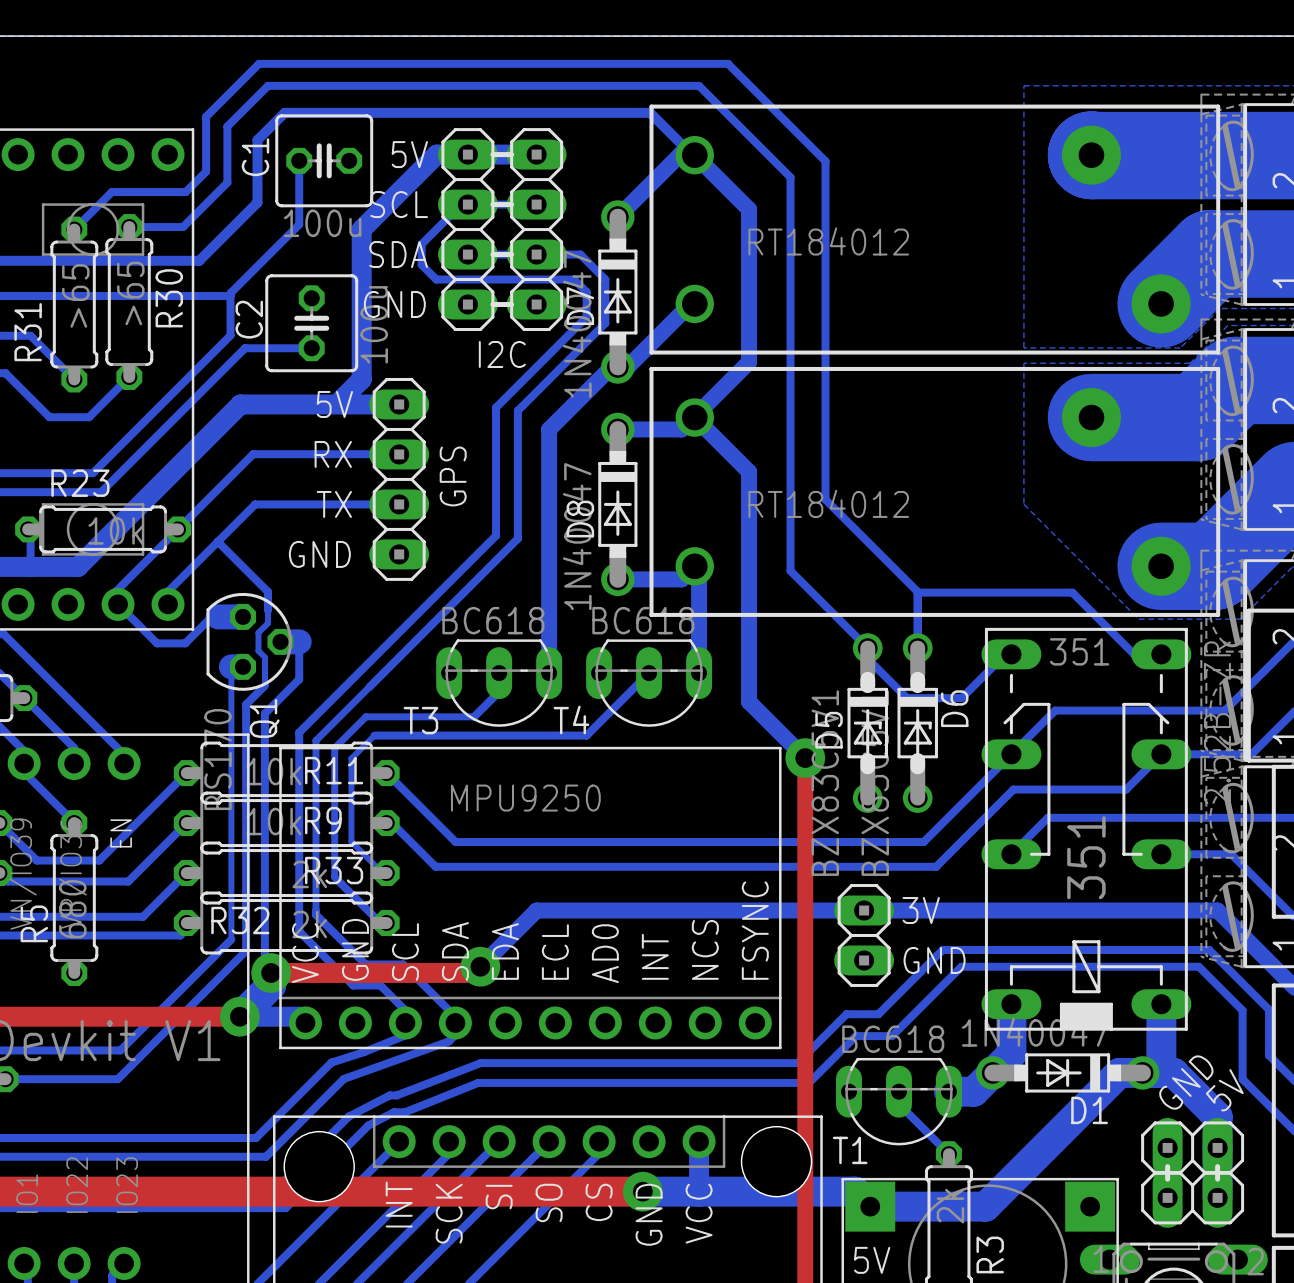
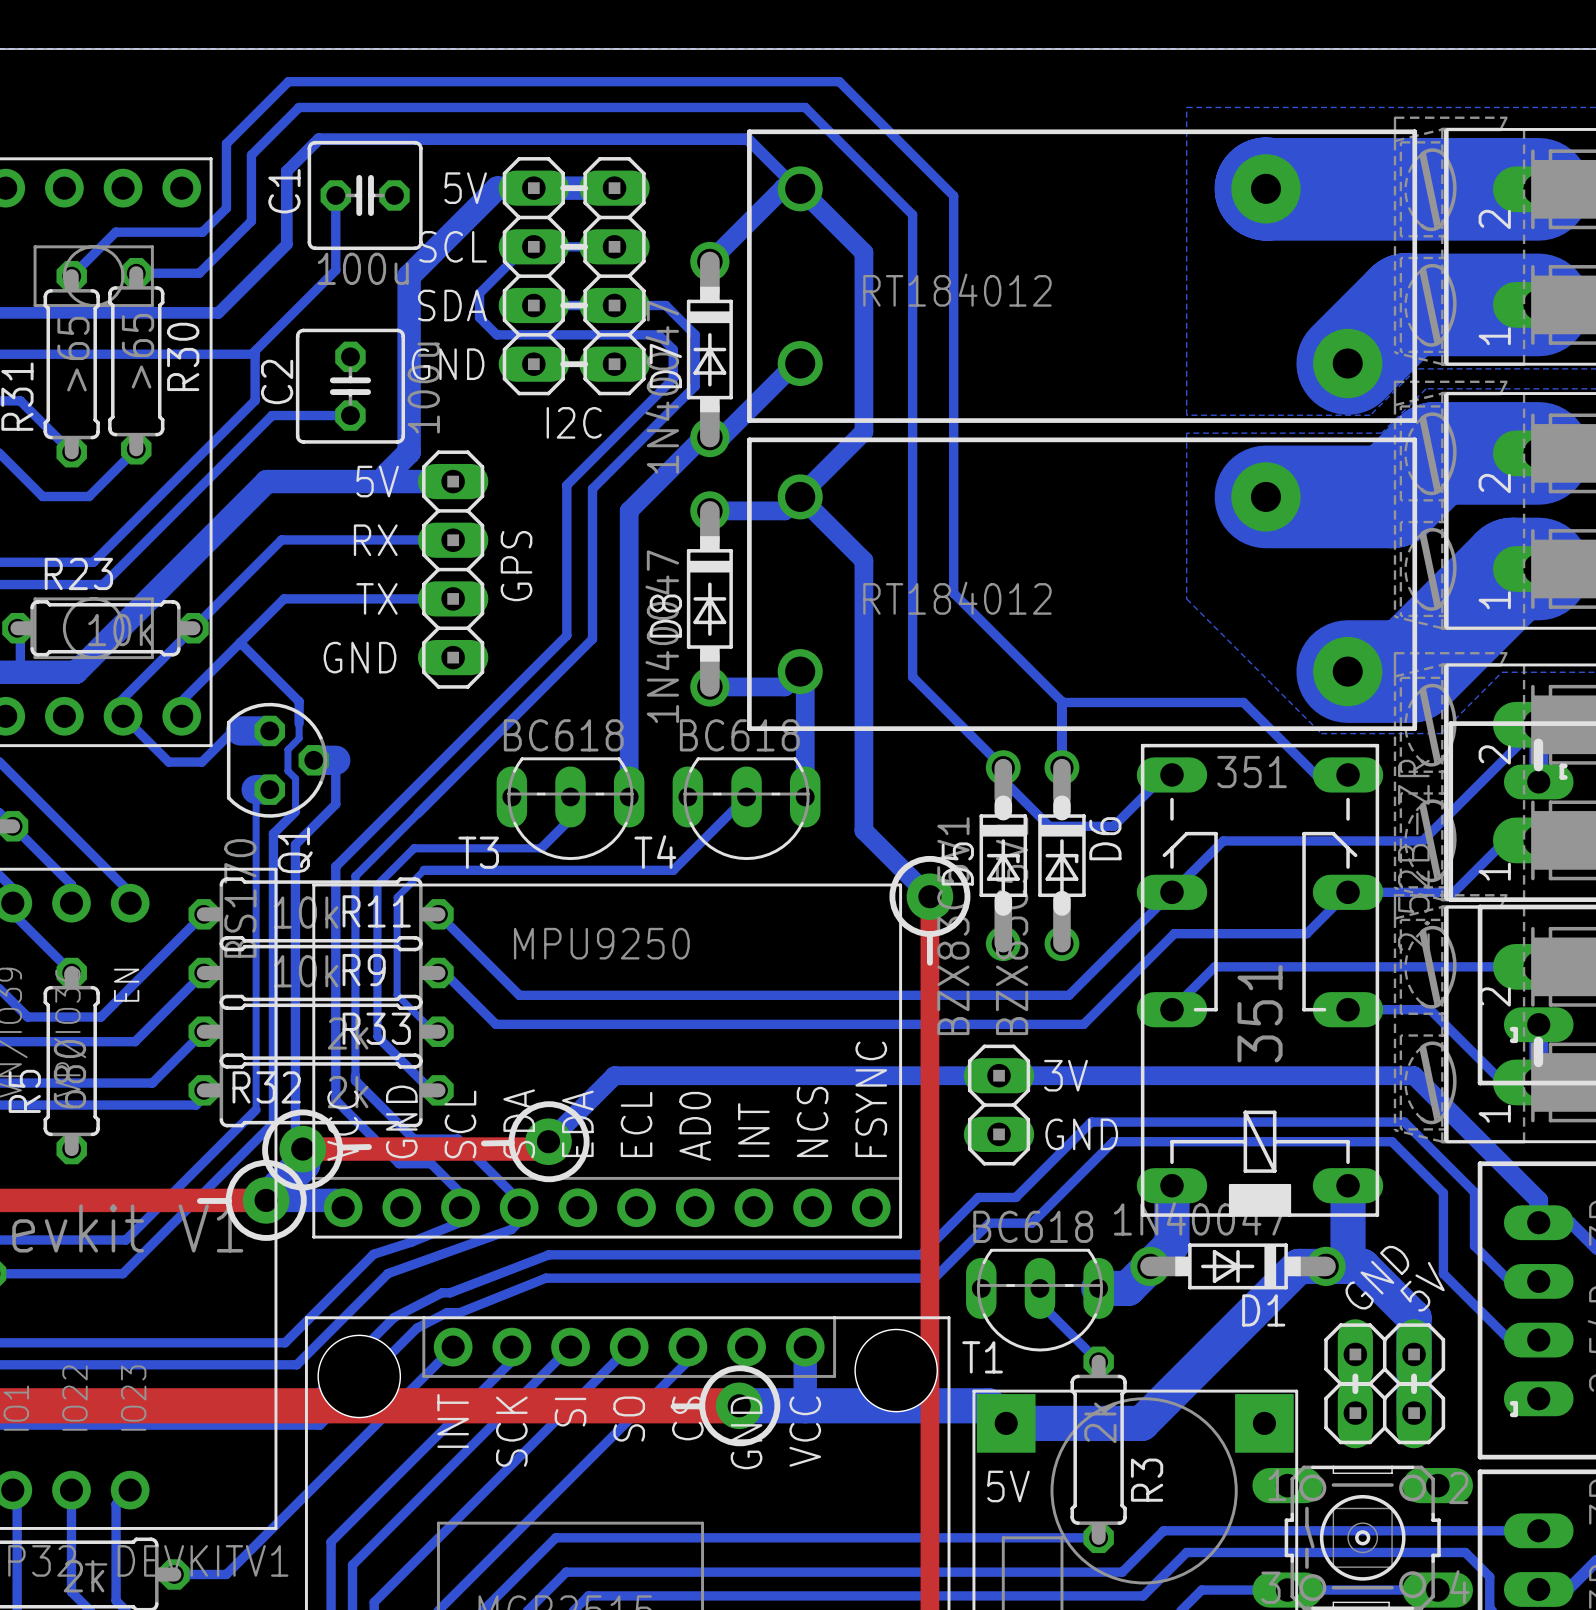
drawing: none -> [889, 855, 971, 937]
line: none -> (929, 933) (929, 962)
drawing: none -> [508, 1101, 590, 1183]
drawing: none -> [225, 1109, 344, 1241]
line: none -> (511, 1142) (483, 1143)
line: none -> (368, 1147) (340, 1147)
line: none -> (199, 1200) (228, 1200)
drawing: none -> [699, 1365, 781, 1447]
line: none -> (673, 1406) (702, 1406)

